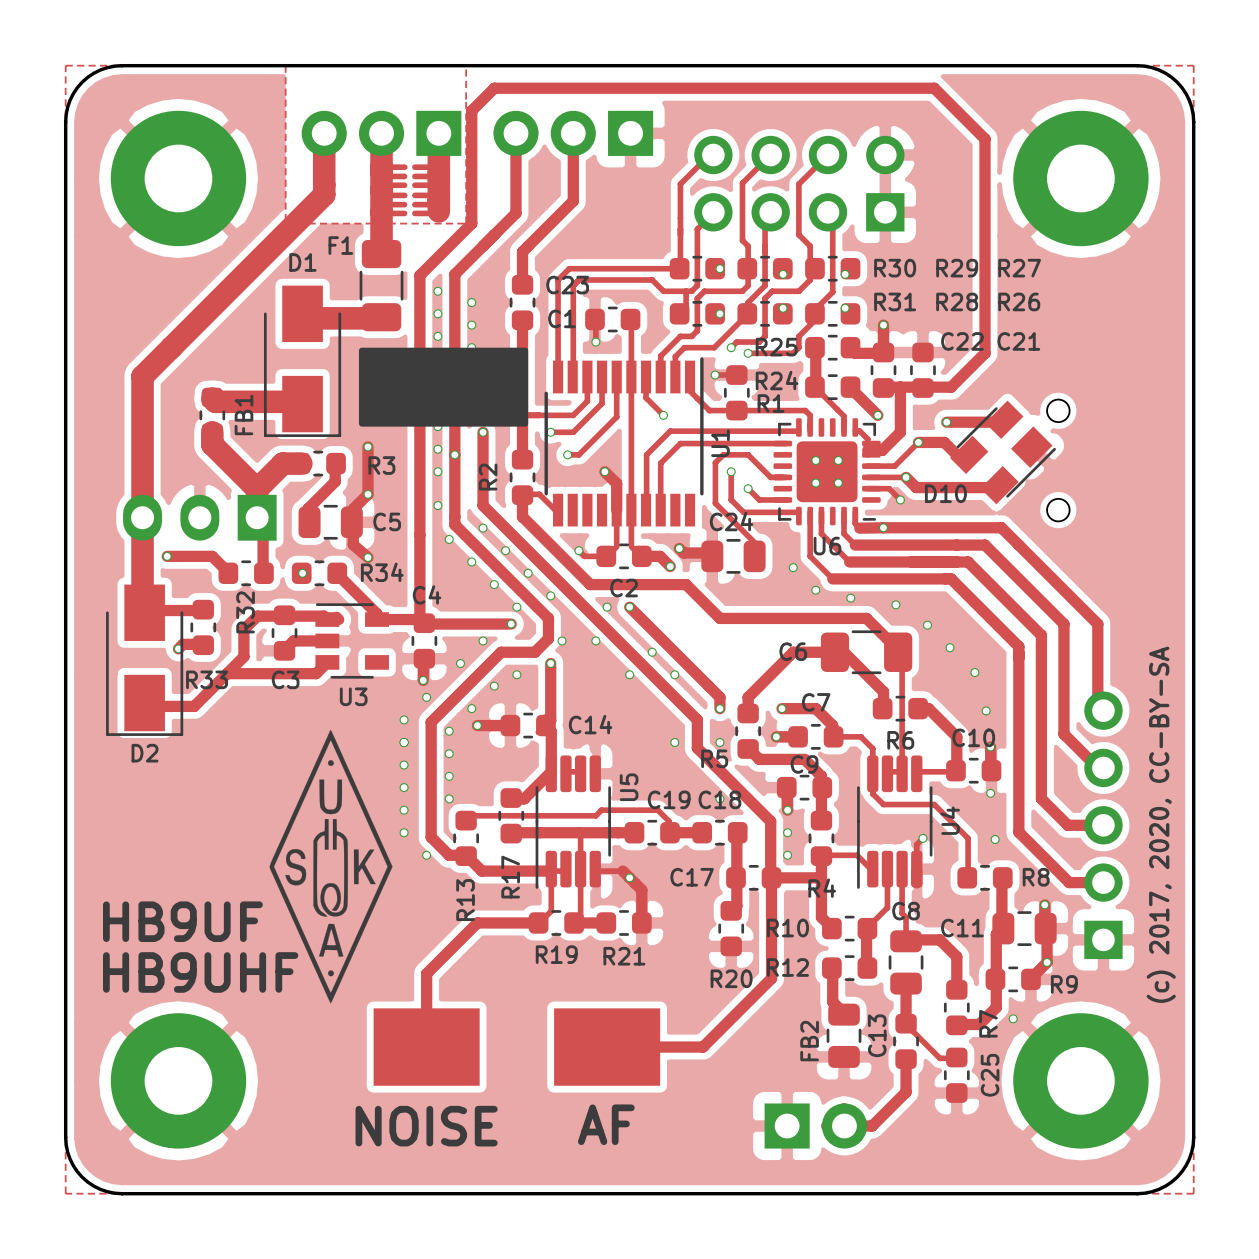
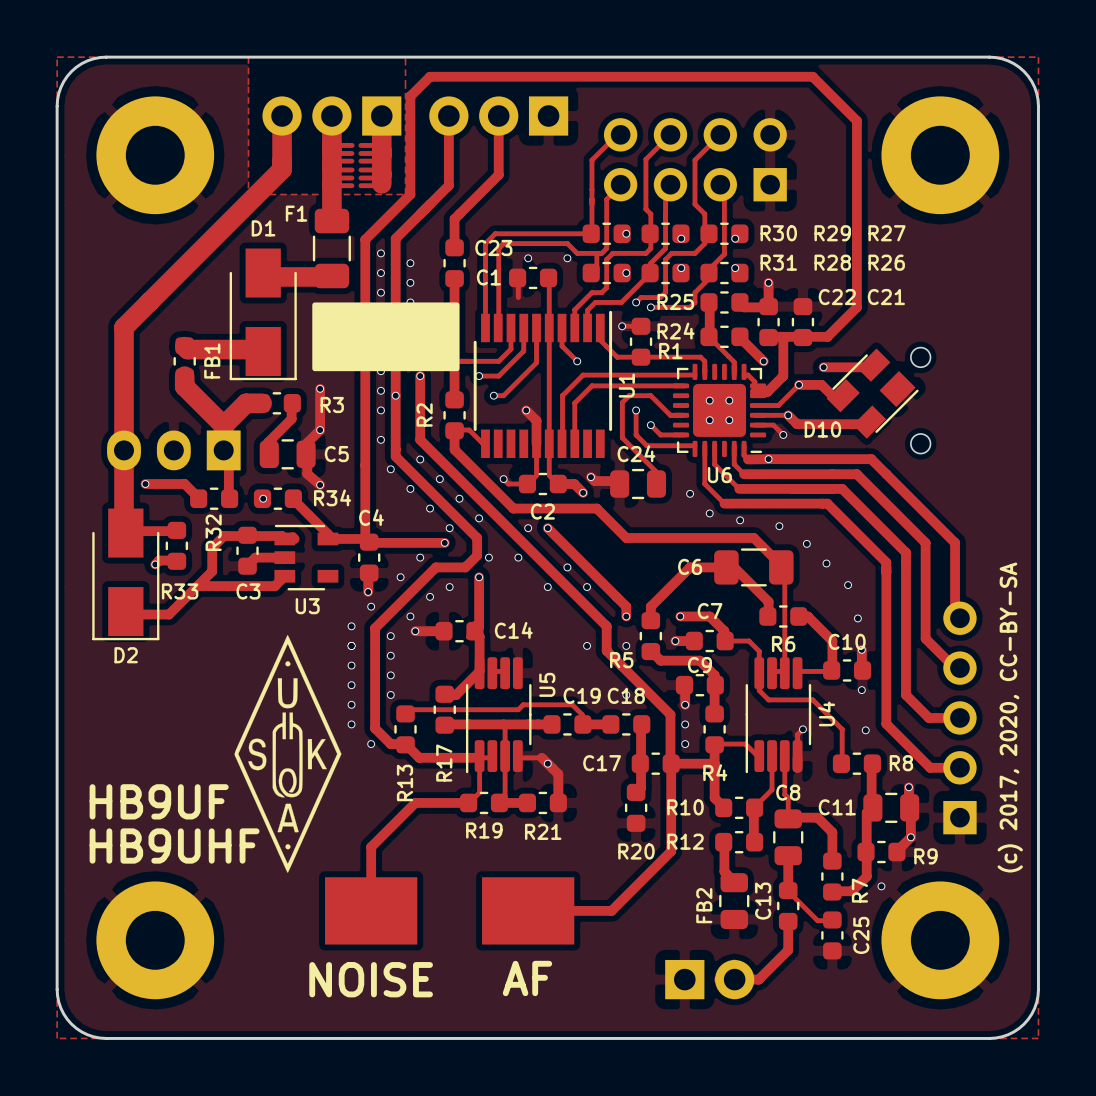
via: none -> (528, 258)
via: none -> (567, 258)
via: (595, 342) -> none

